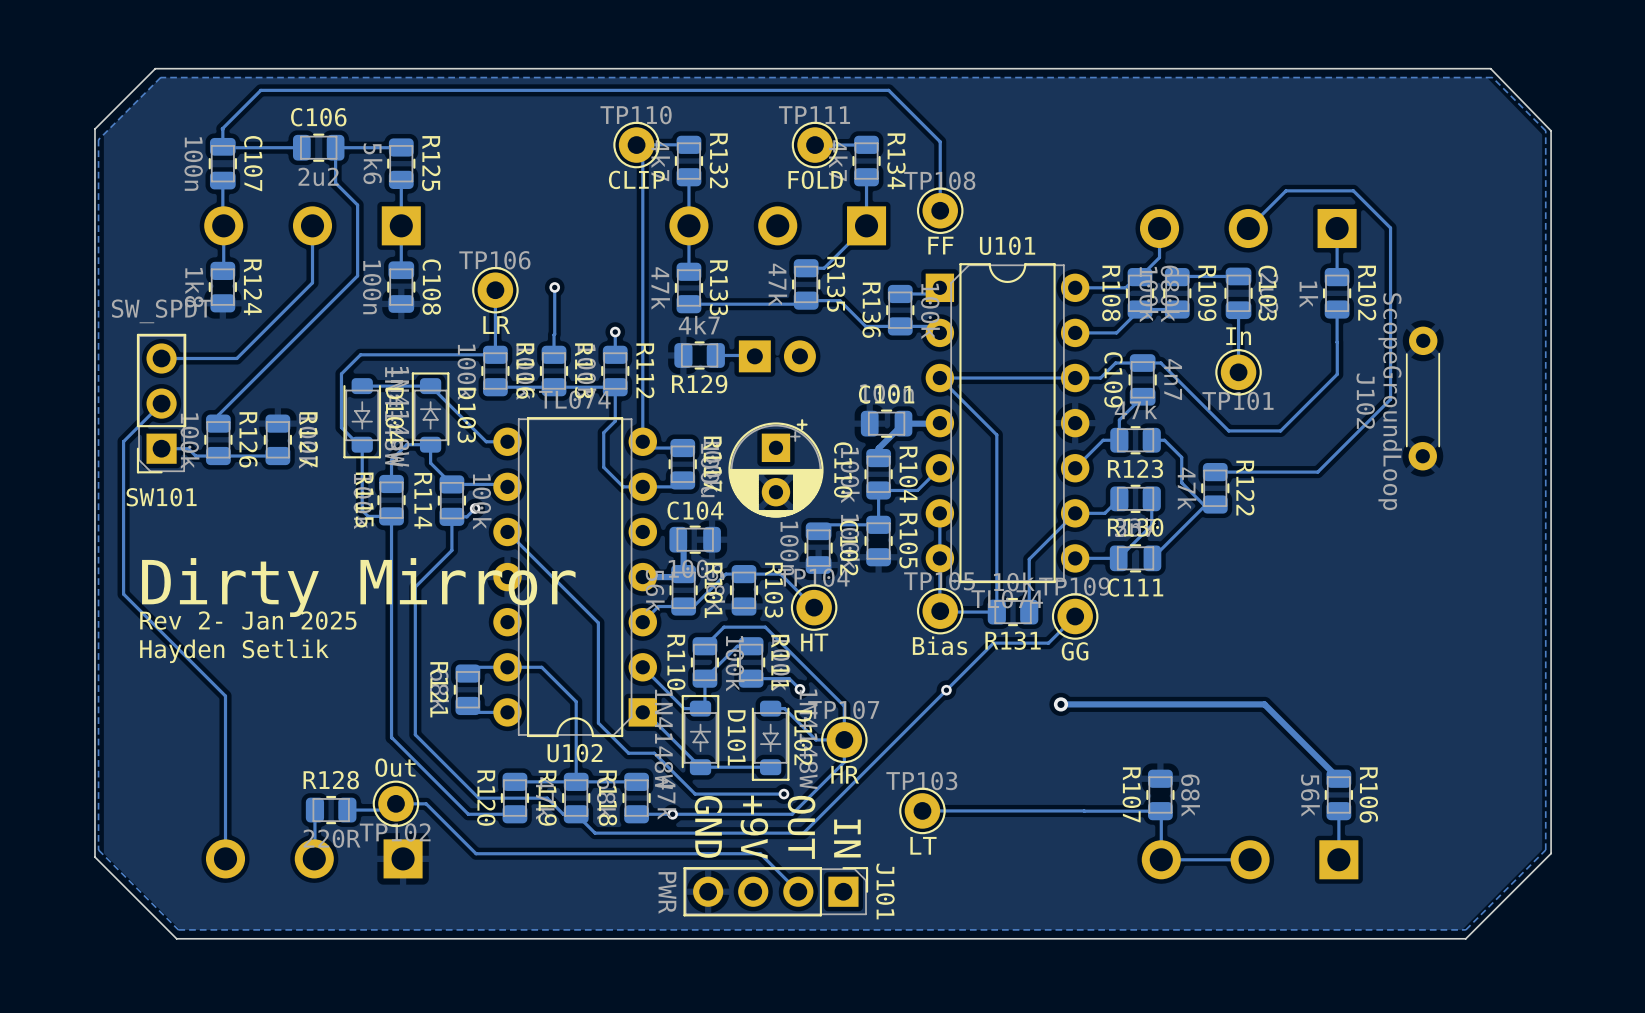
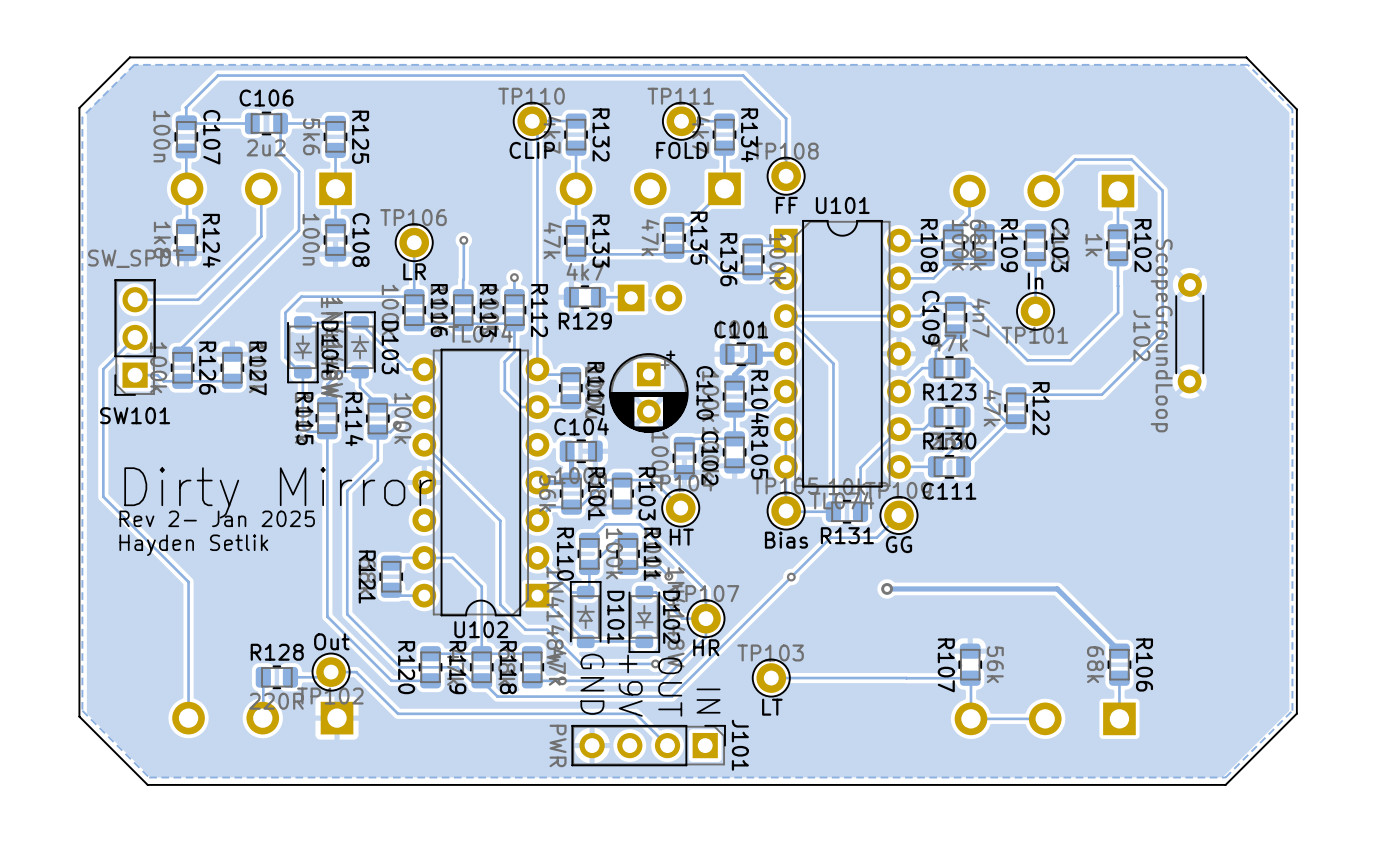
R107 value: 68k (1190, 795) -> 56k (995, 664)
R106 value: 56k (1310, 795) -> 68k (1095, 664)

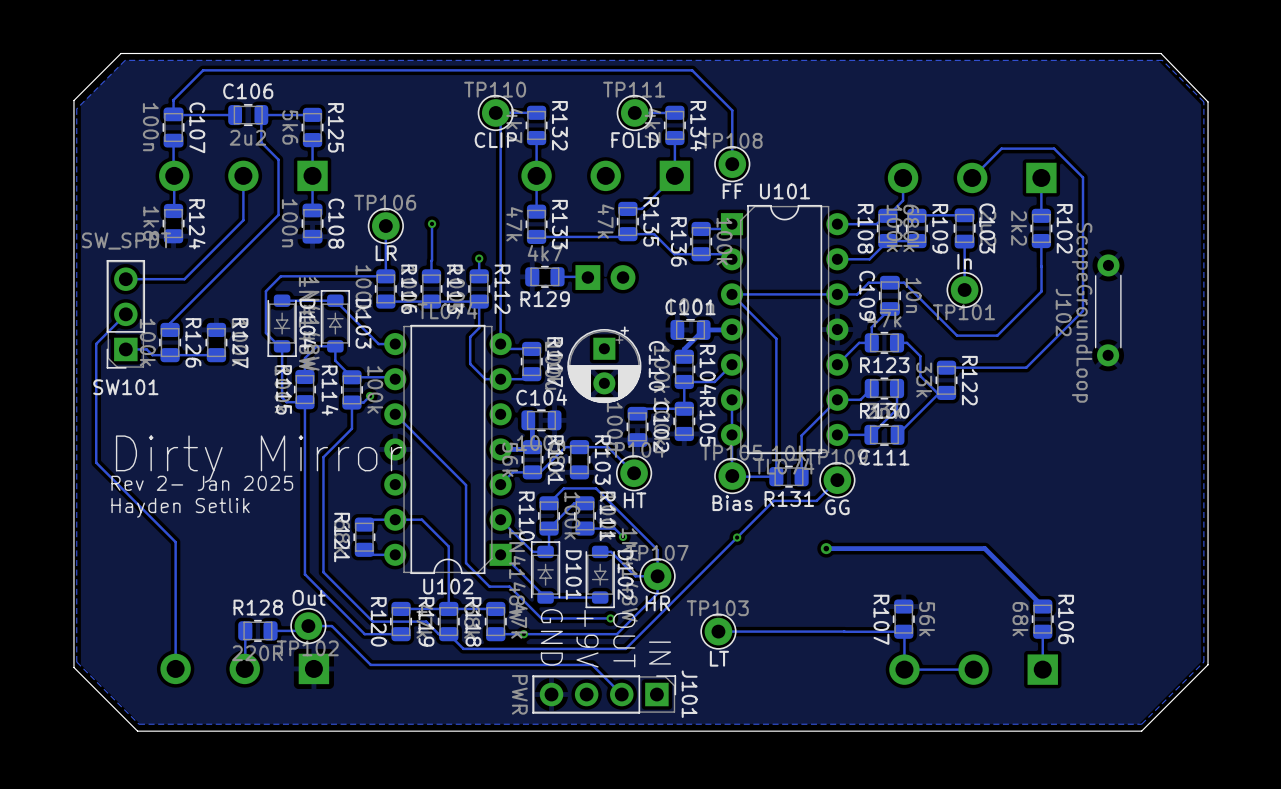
R102 value: 1k (1094, 245) -> 2k2 (1019, 228)
C109 value: 4n7 (981, 317) -> 10n (913, 295)
R122 value: 47k (992, 408) -> 33k (924, 379)

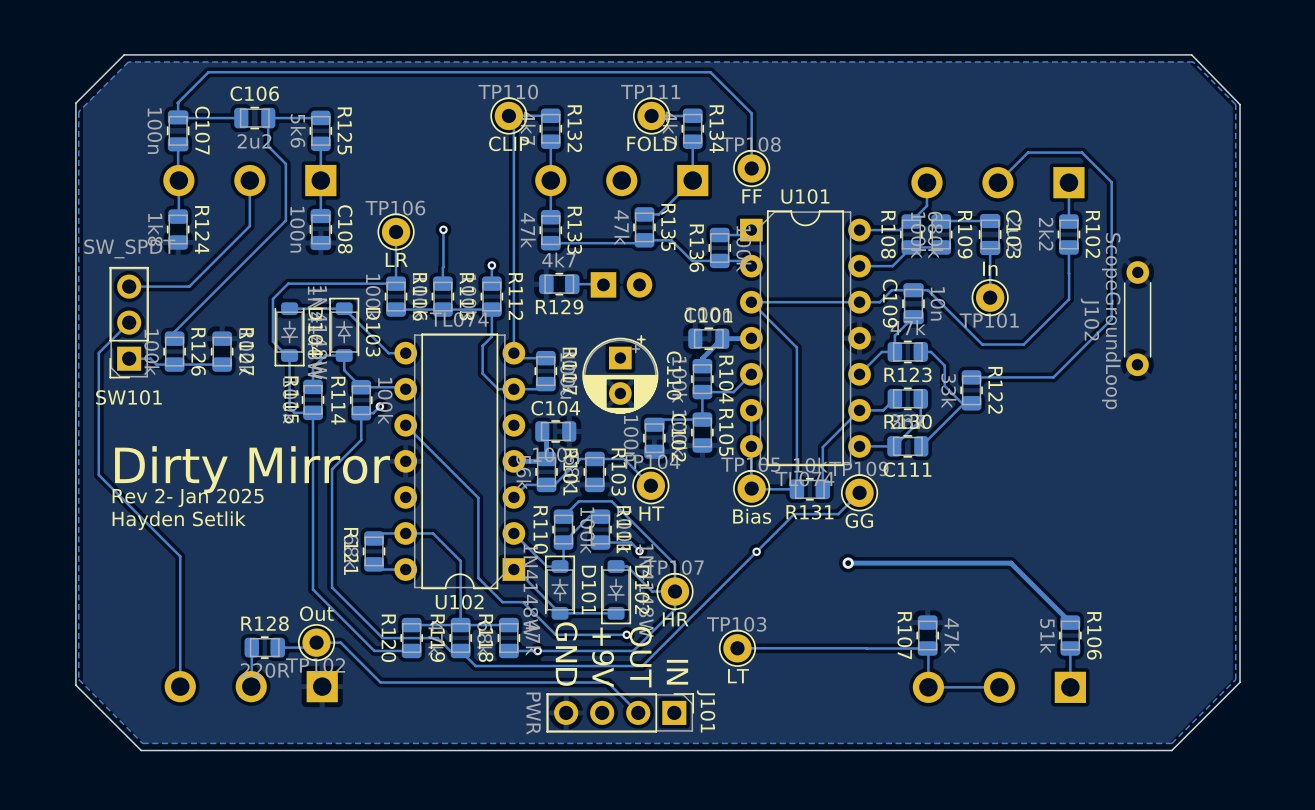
R107 value: 56k (927, 619) -> 47k (951, 635)
R106 value: 68k (1020, 619) -> 51k (1047, 636)

